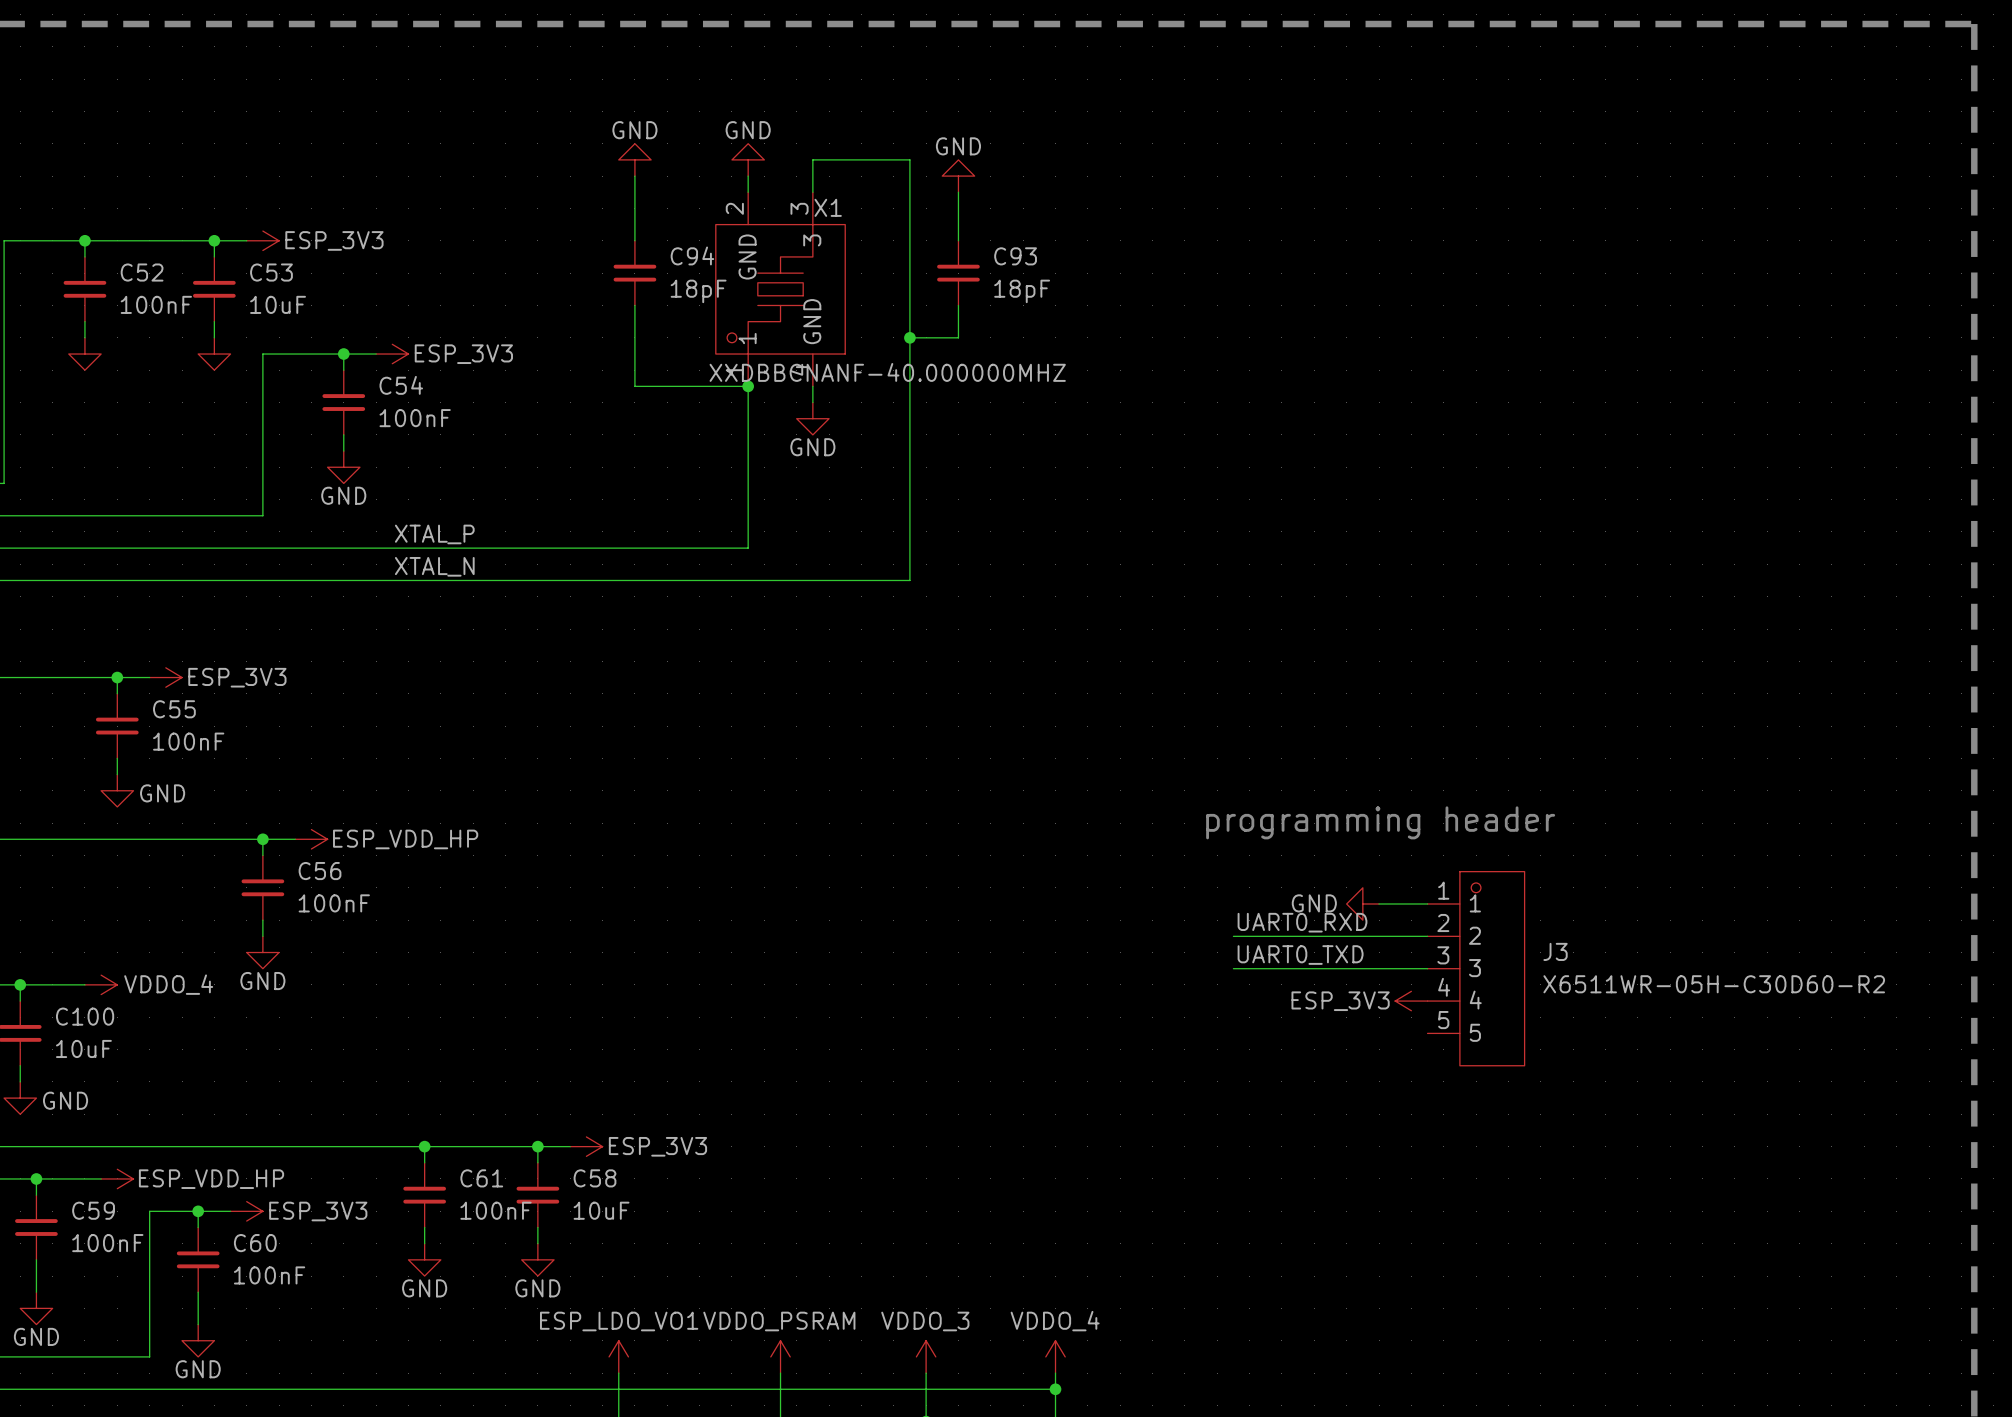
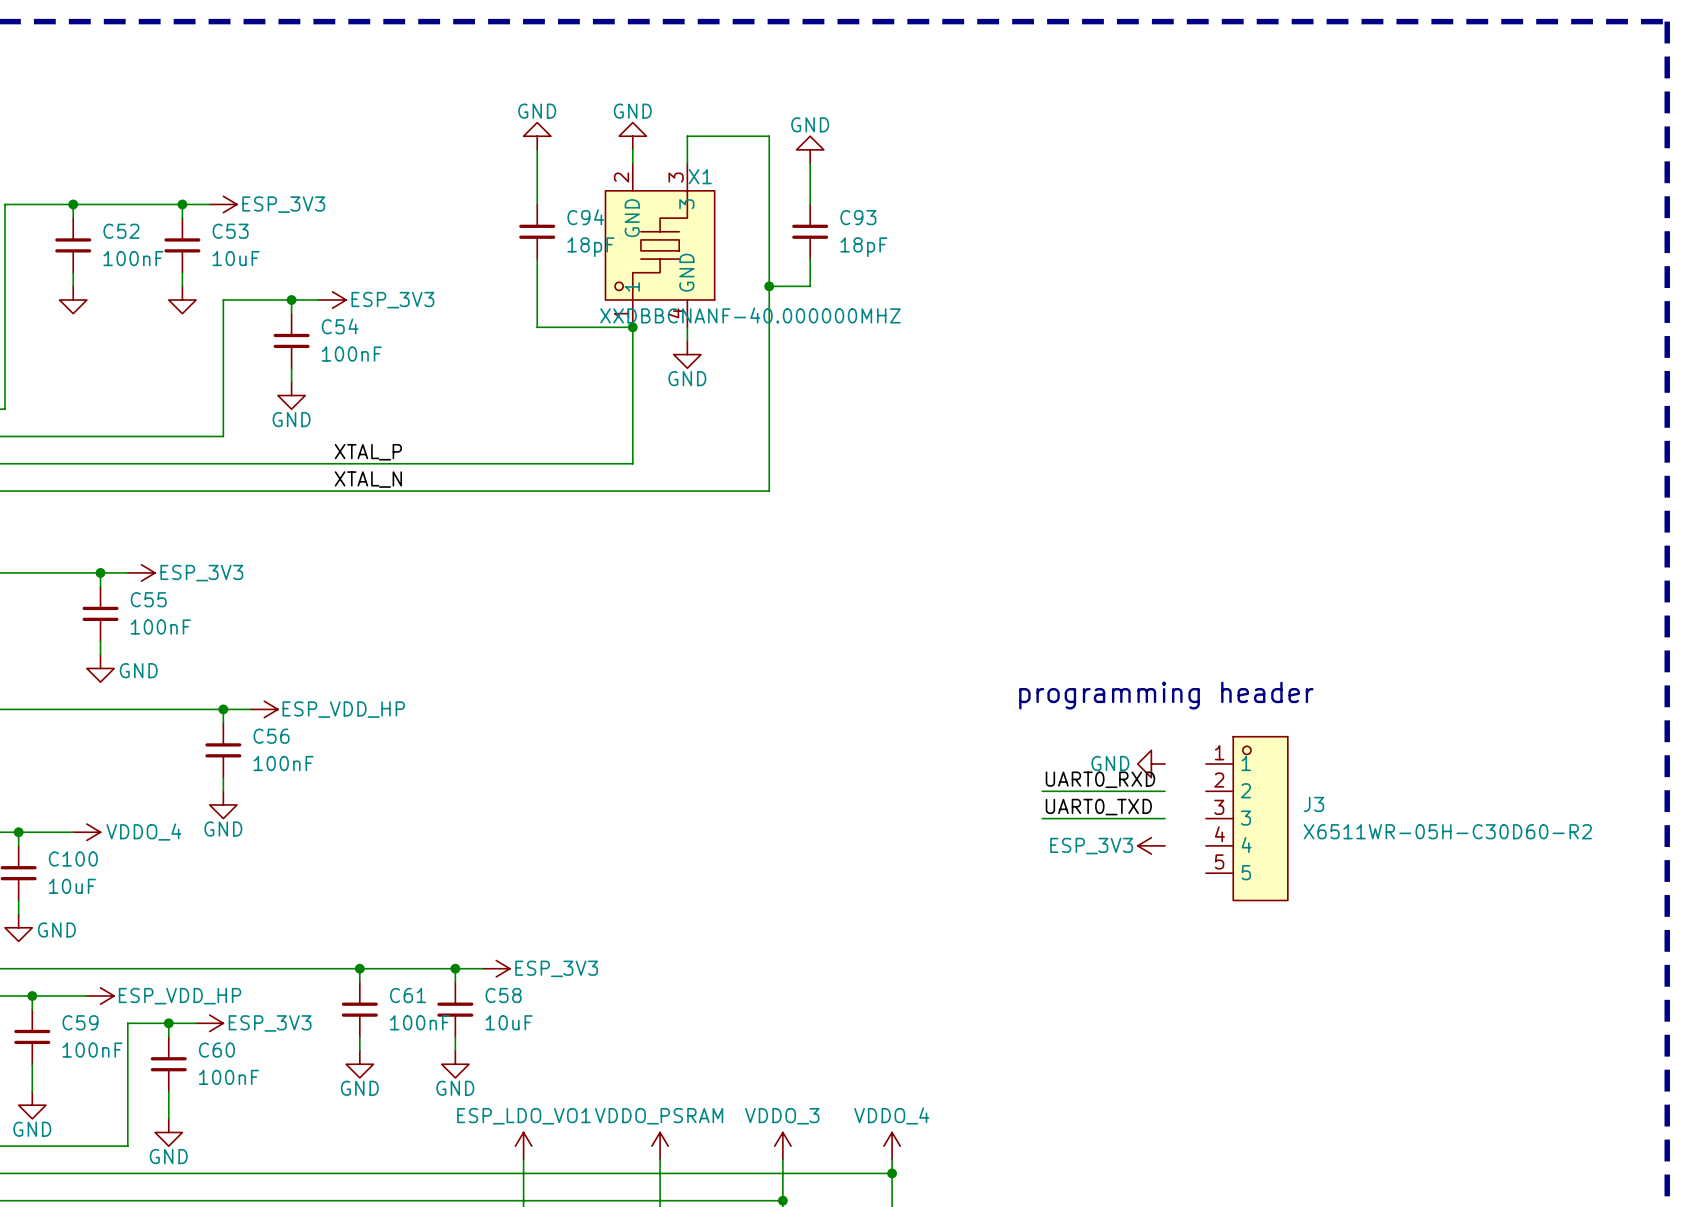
wire: (1379, 903) (1427, 903) -> none
wire: (1379, 936) (1427, 936) -> none
wire: (1379, 968) (1427, 968) -> none
power symbol position: ESP_3V3 (1411, 1001) -> ESP_3V3 (1151, 845)

